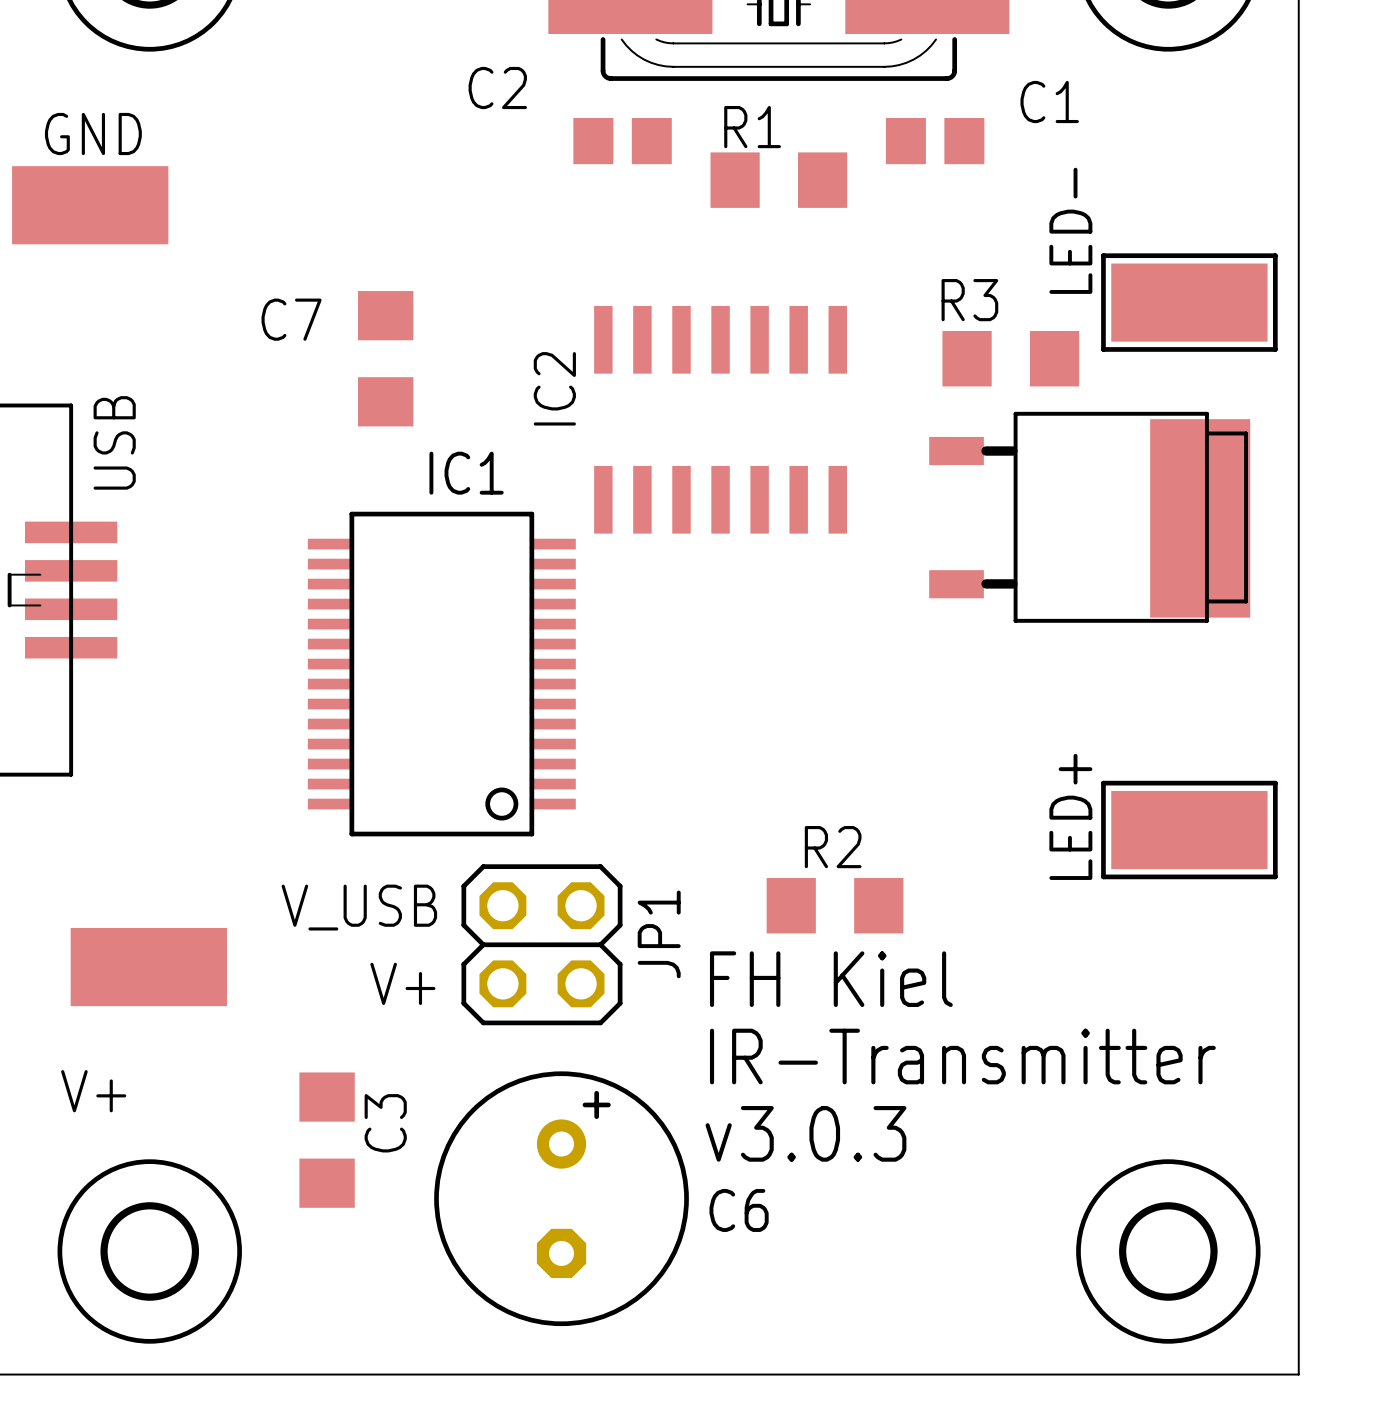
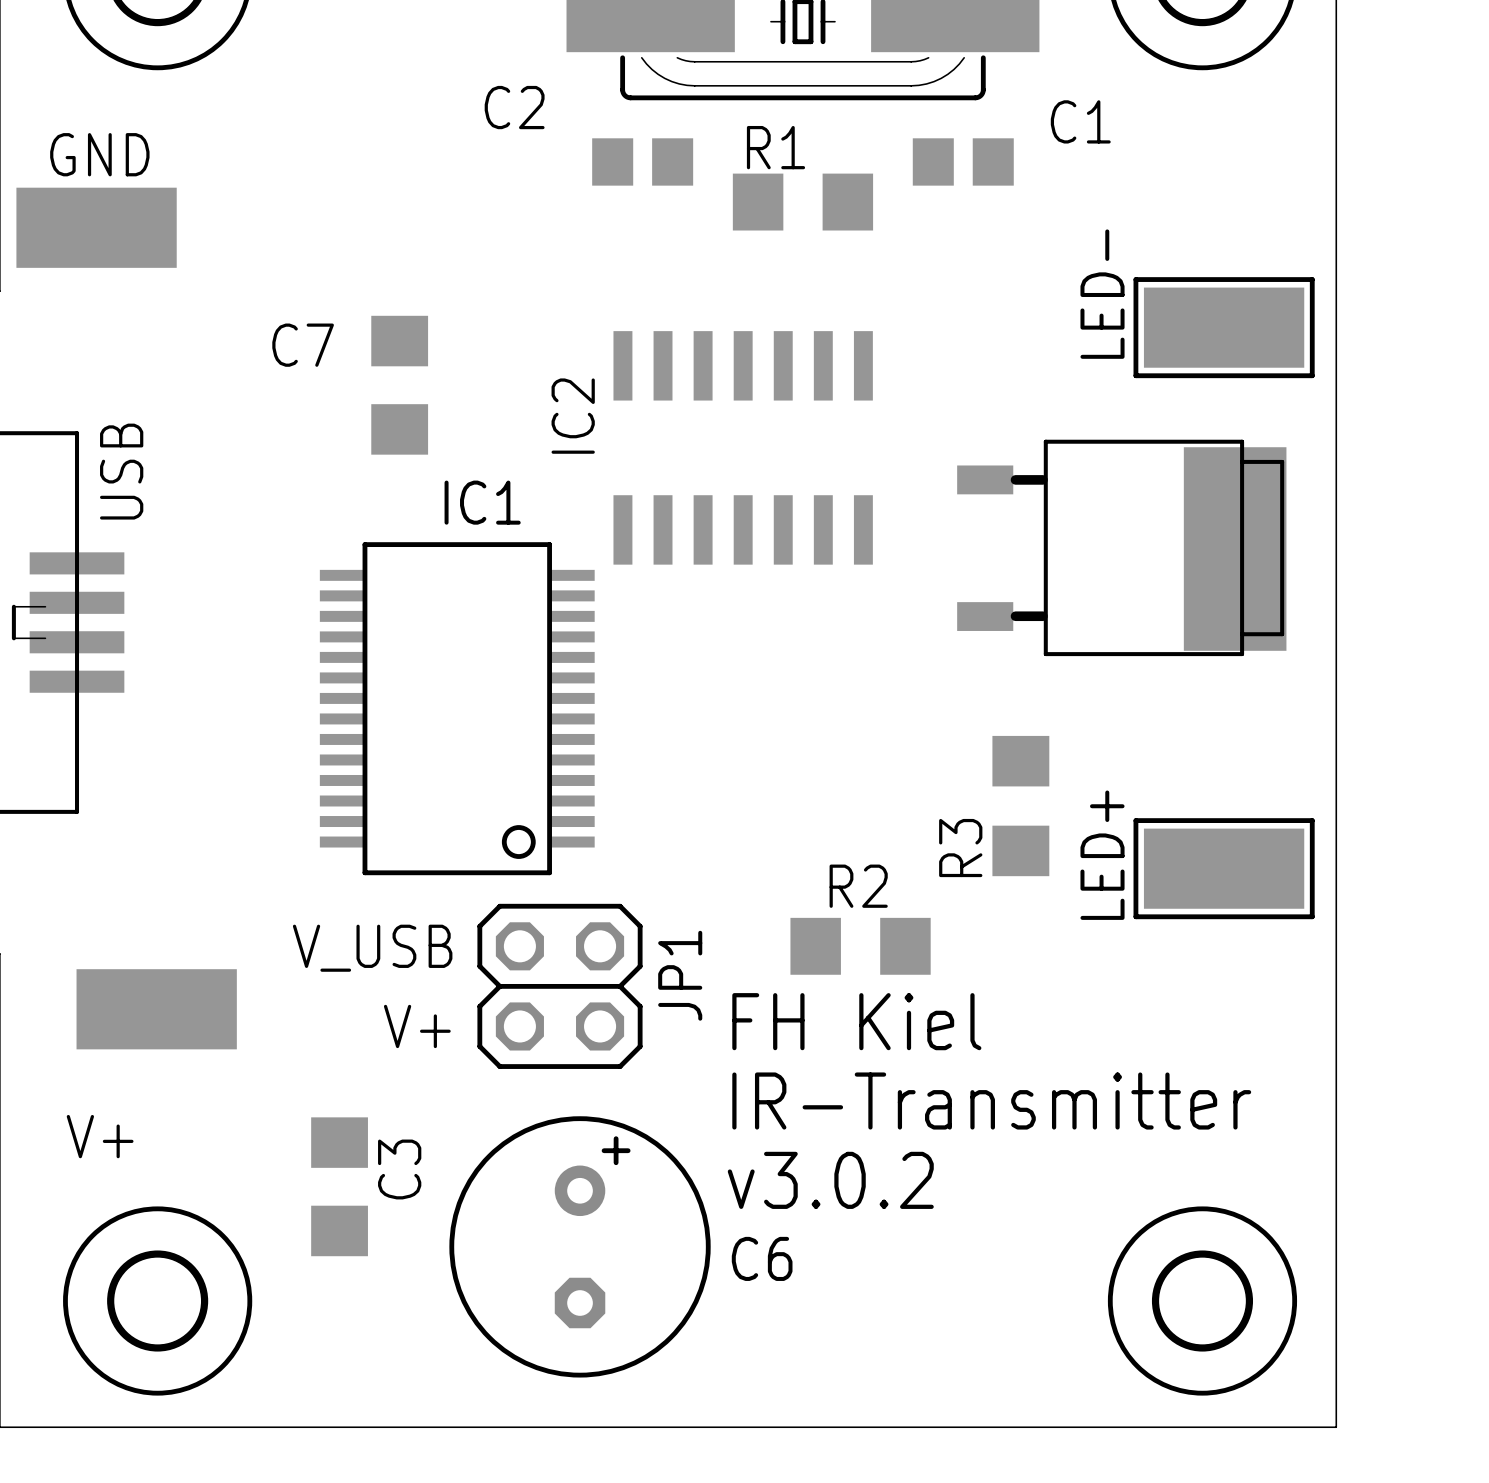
LED- name position: LED- (1070, 230) -> LED- (1102, 294)
R3 name position: R3 (969, 300) -> R3 (960, 848)
R3 rotation: 0° (1010, 358) -> 90° clockwise (1020, 806)
R3 position: (1010, 358) -> (1020, 806)
text: v3.0.3 (805, 1133) -> v3.0.2 (830, 1180)

